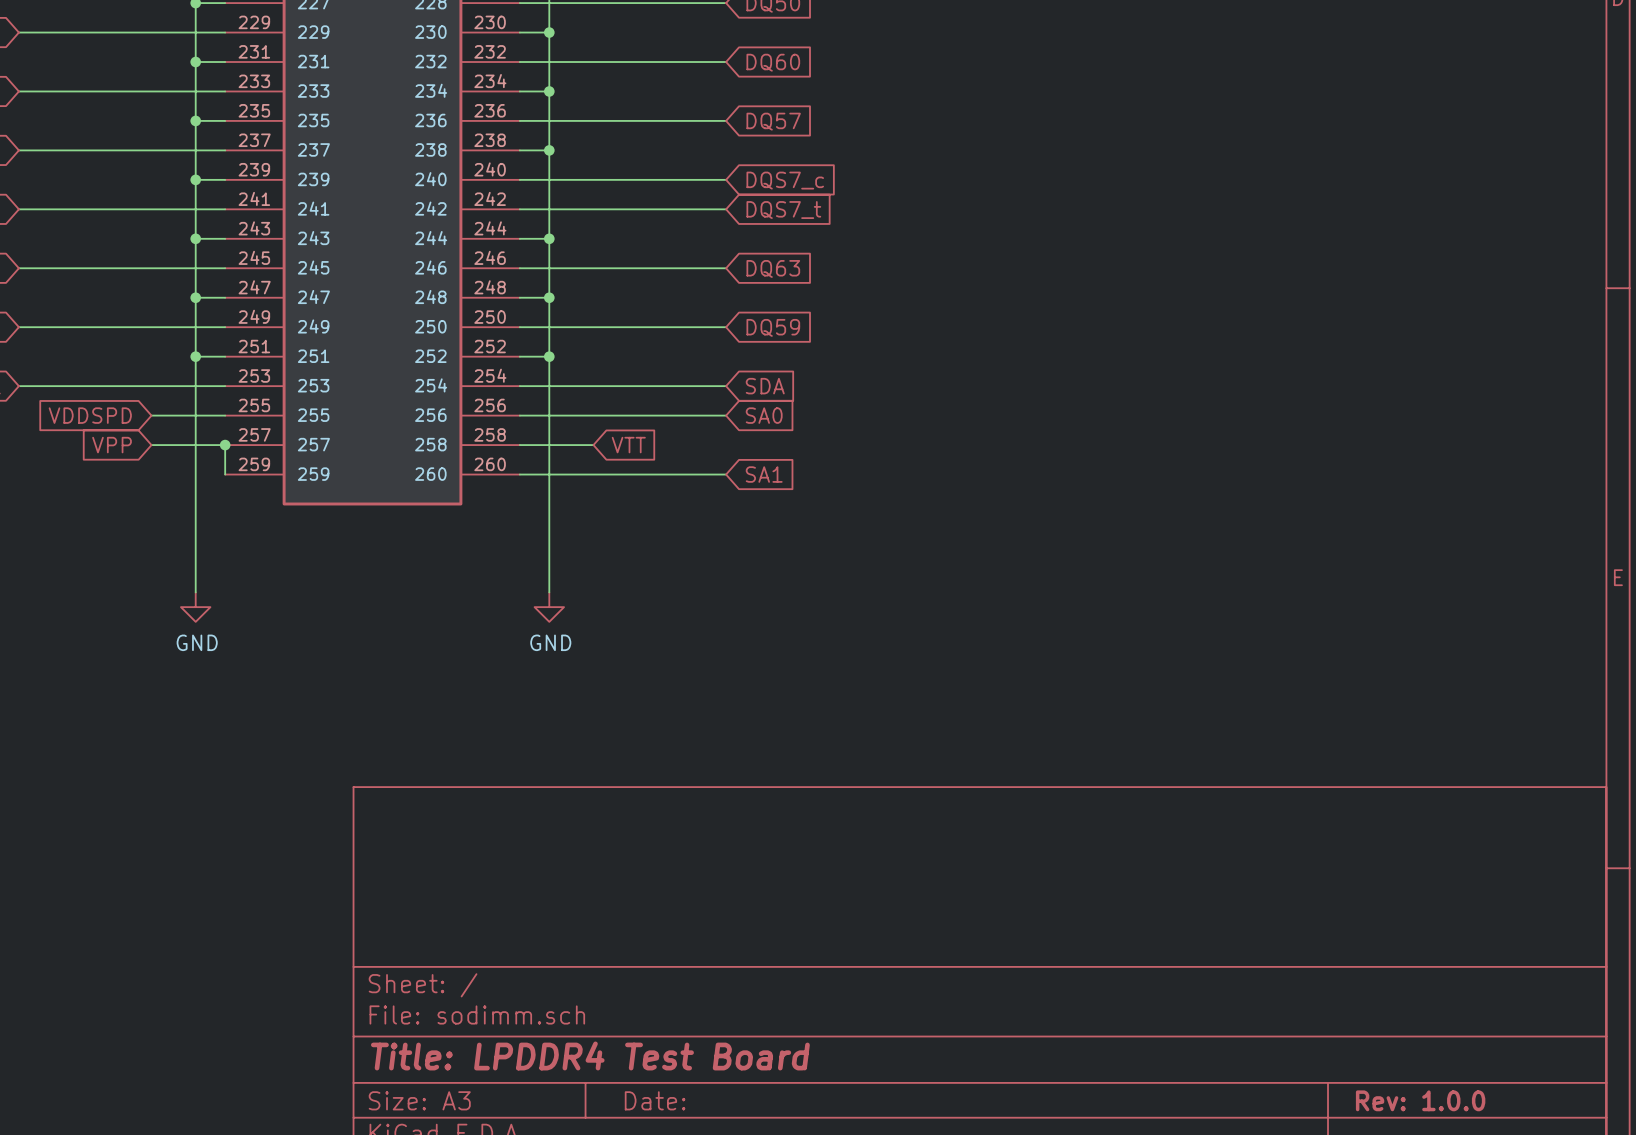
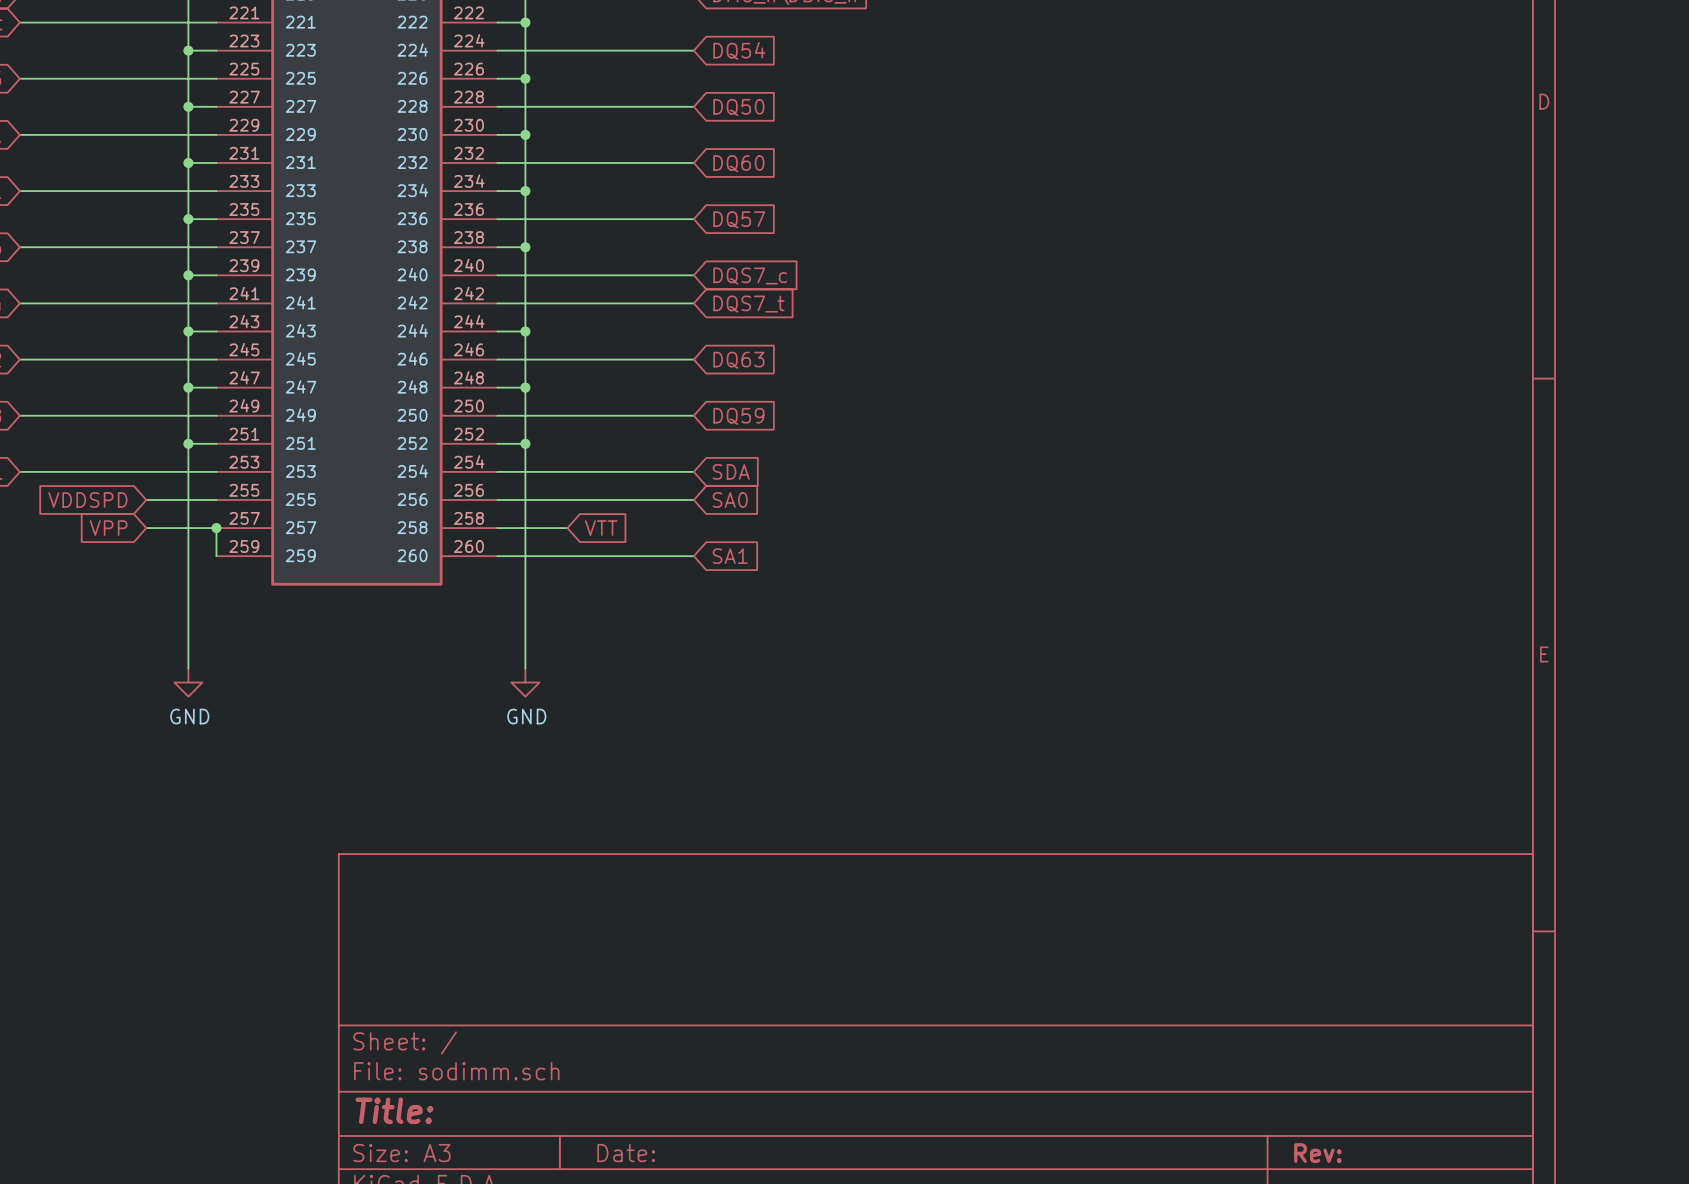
title block: Title: LPDDR4 Test Board (590, 1055) -> Title: (394, 1110)
title block: Rev: 1.0.0 (1420, 1100) -> Rev: (1317, 1153)

